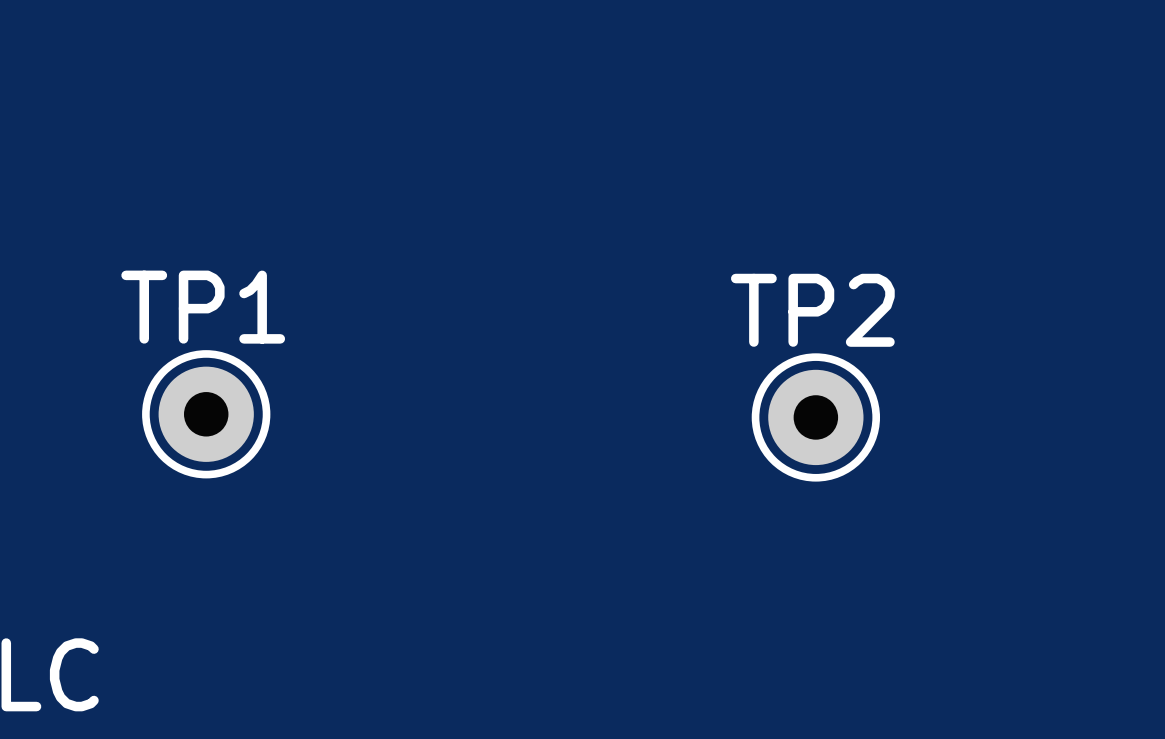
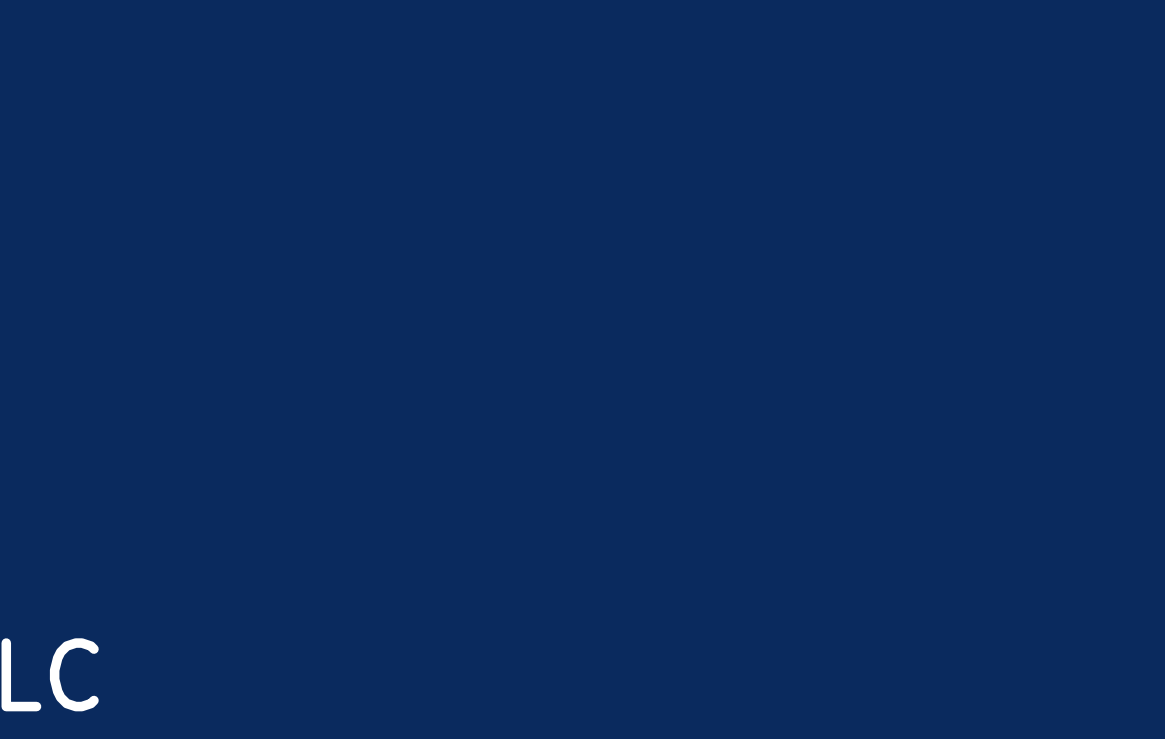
part: (206, 414) -> none
part: (815, 417) -> none

